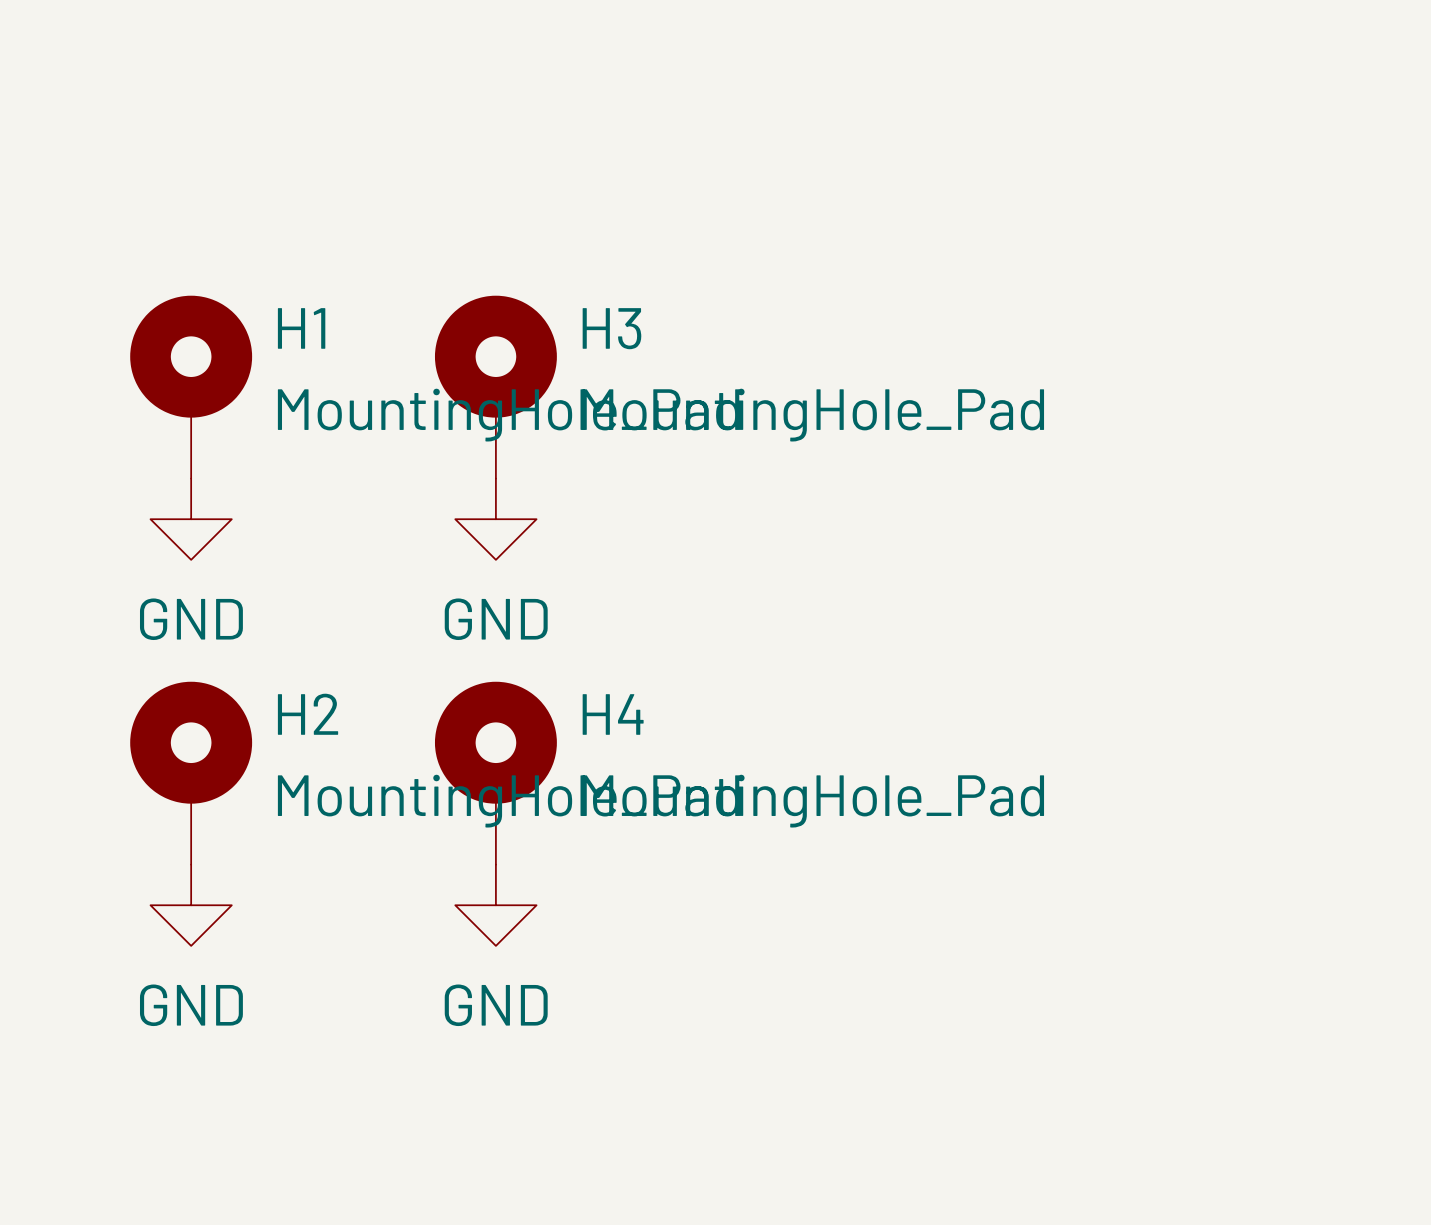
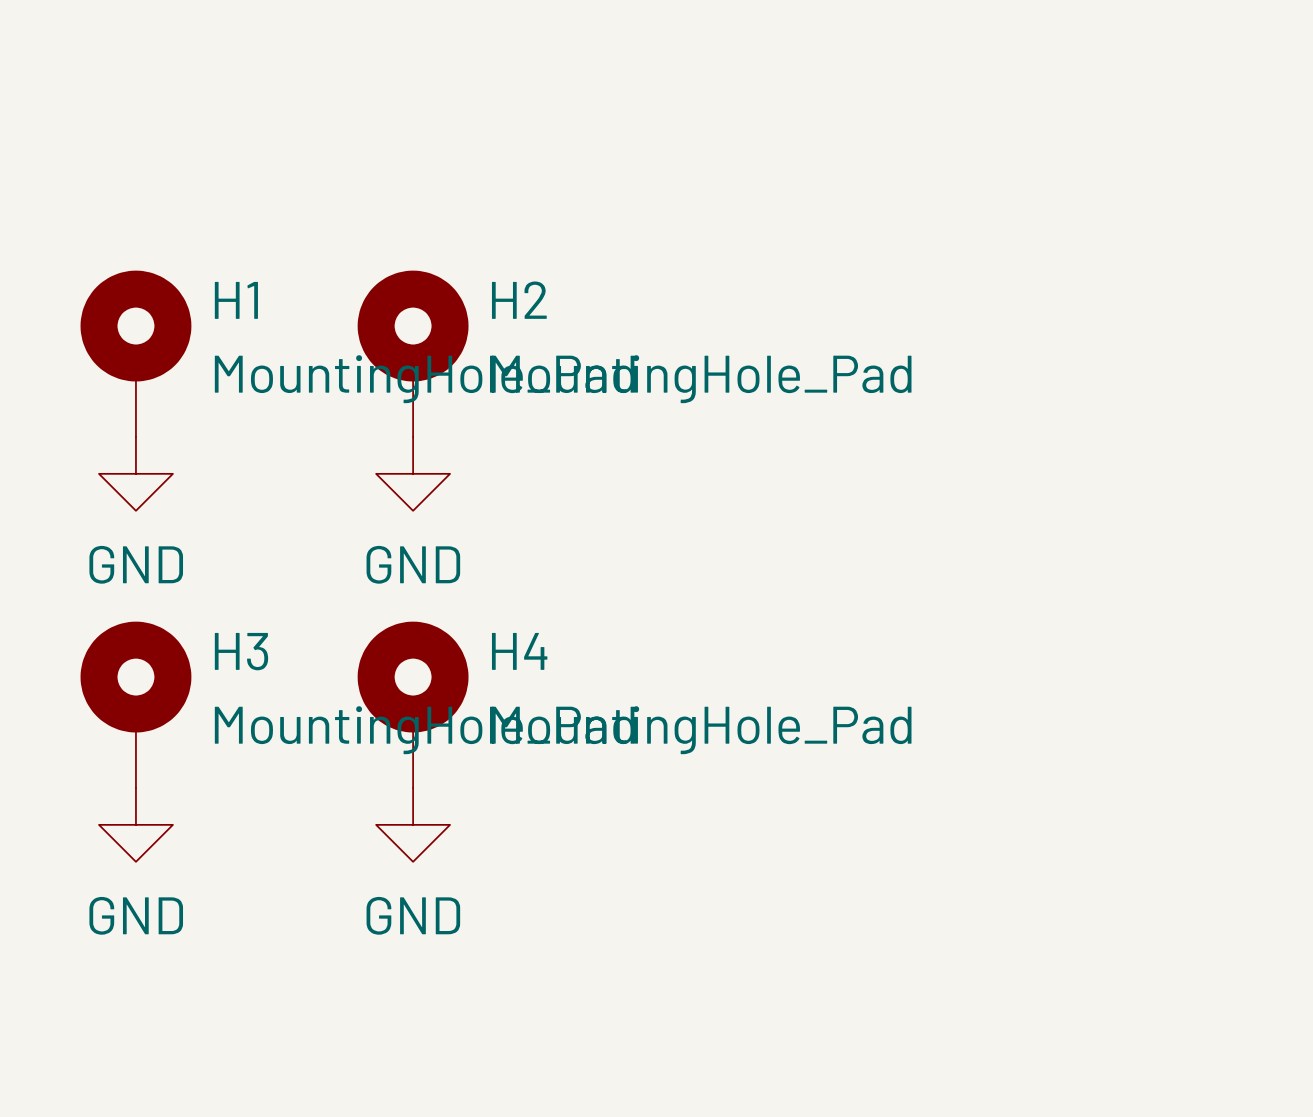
H3 name: H3 (611, 328) -> H2 (519, 300)
H2 name: H2 (308, 714) -> H3 (241, 651)

